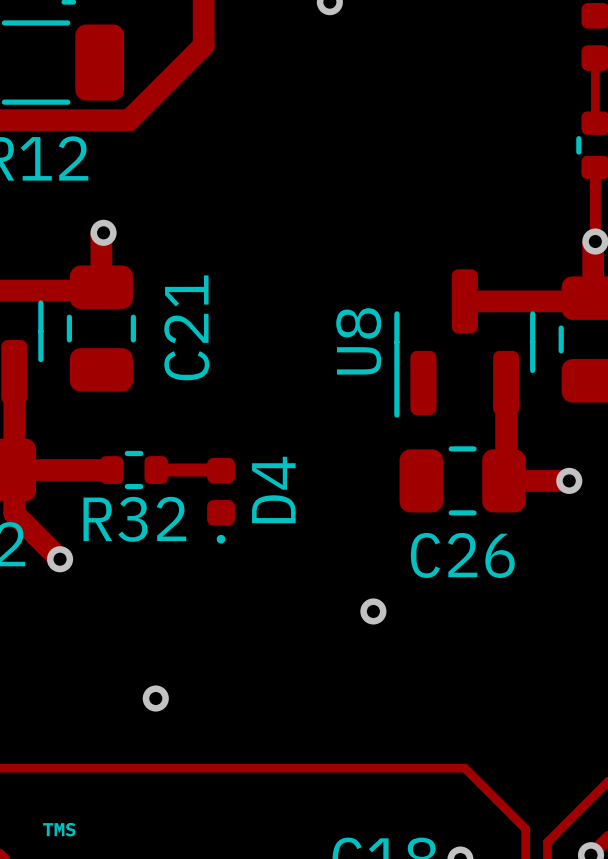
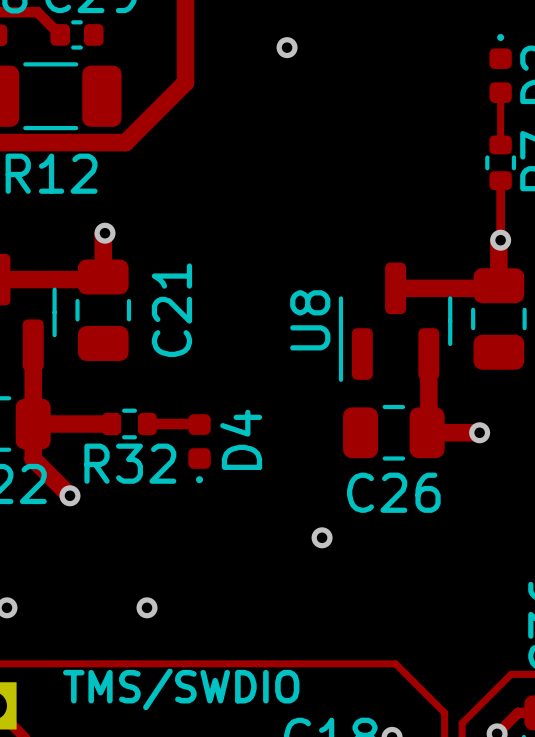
text: TMS (59, 829) -> TMS/SWDIO (181, 689)

